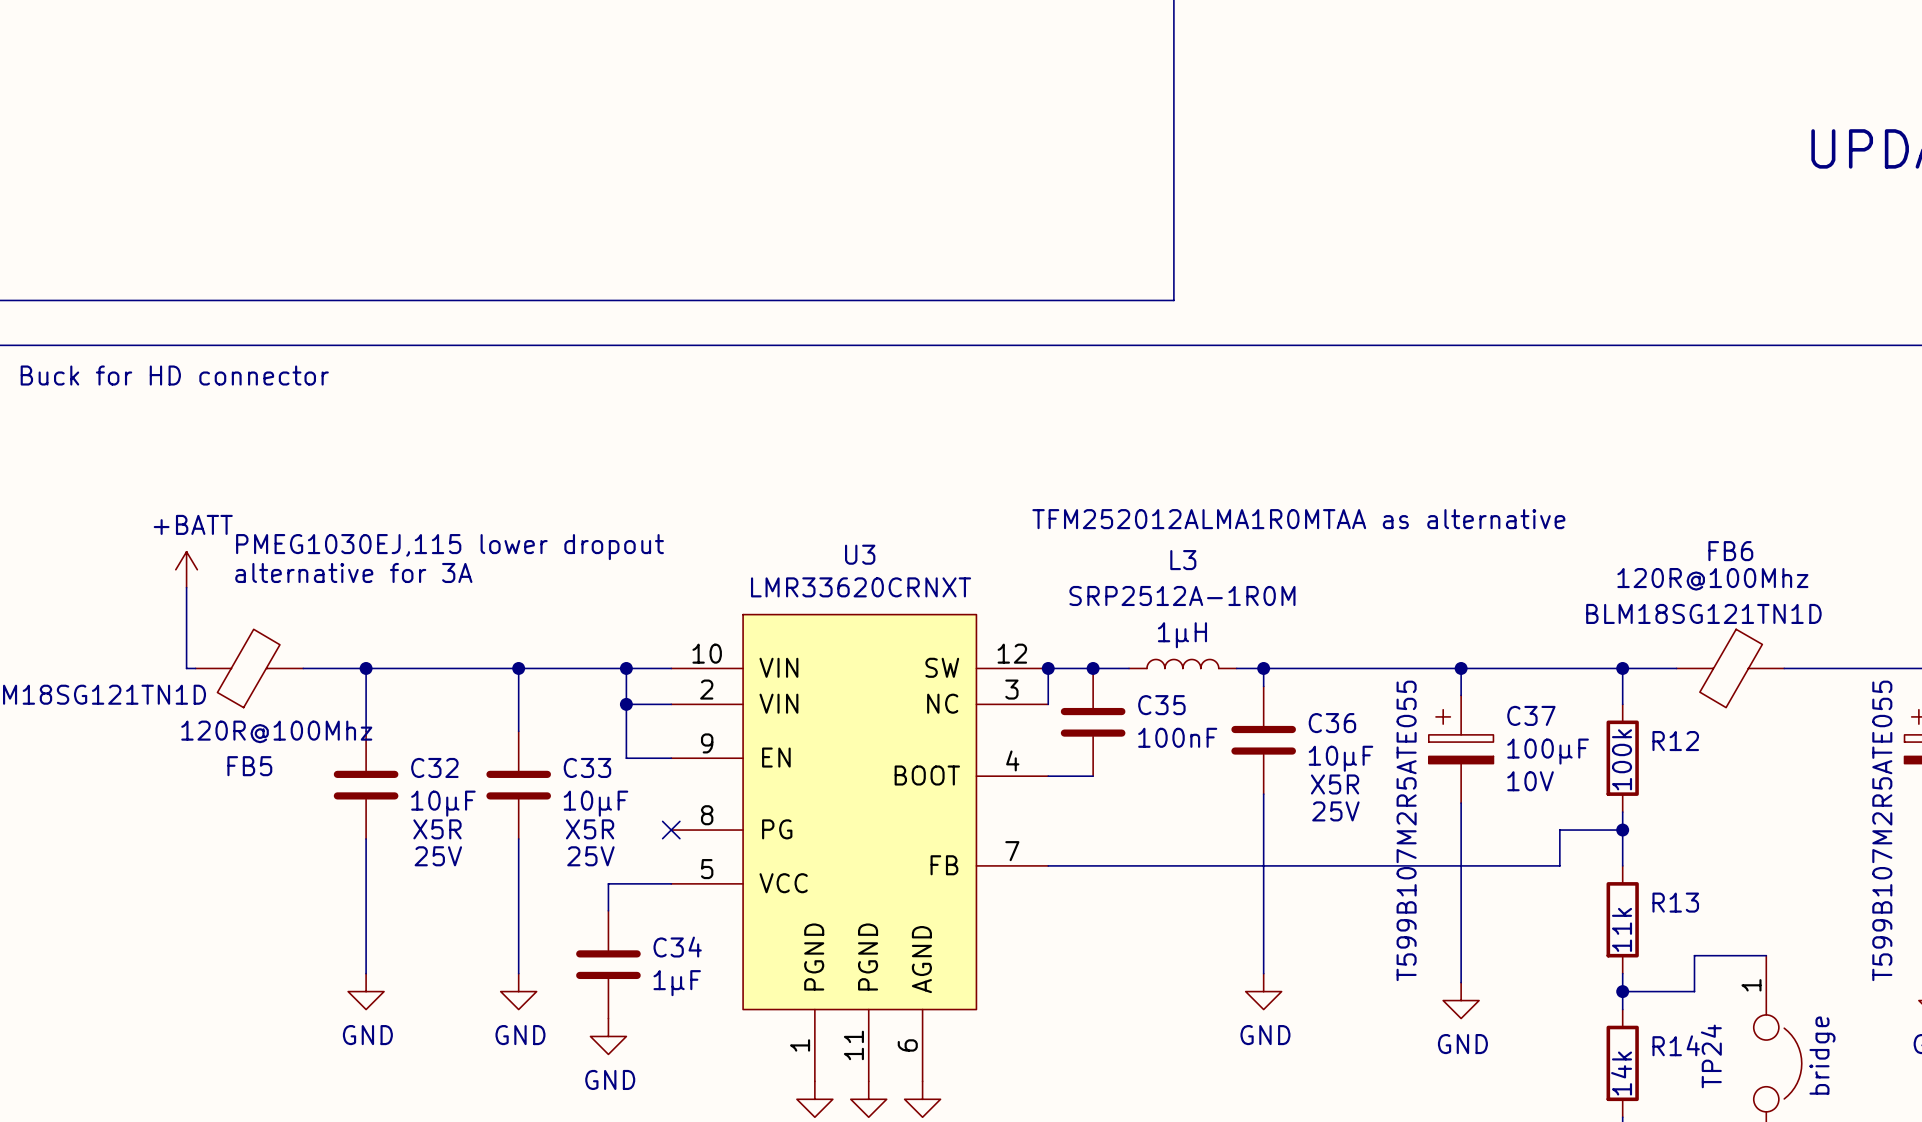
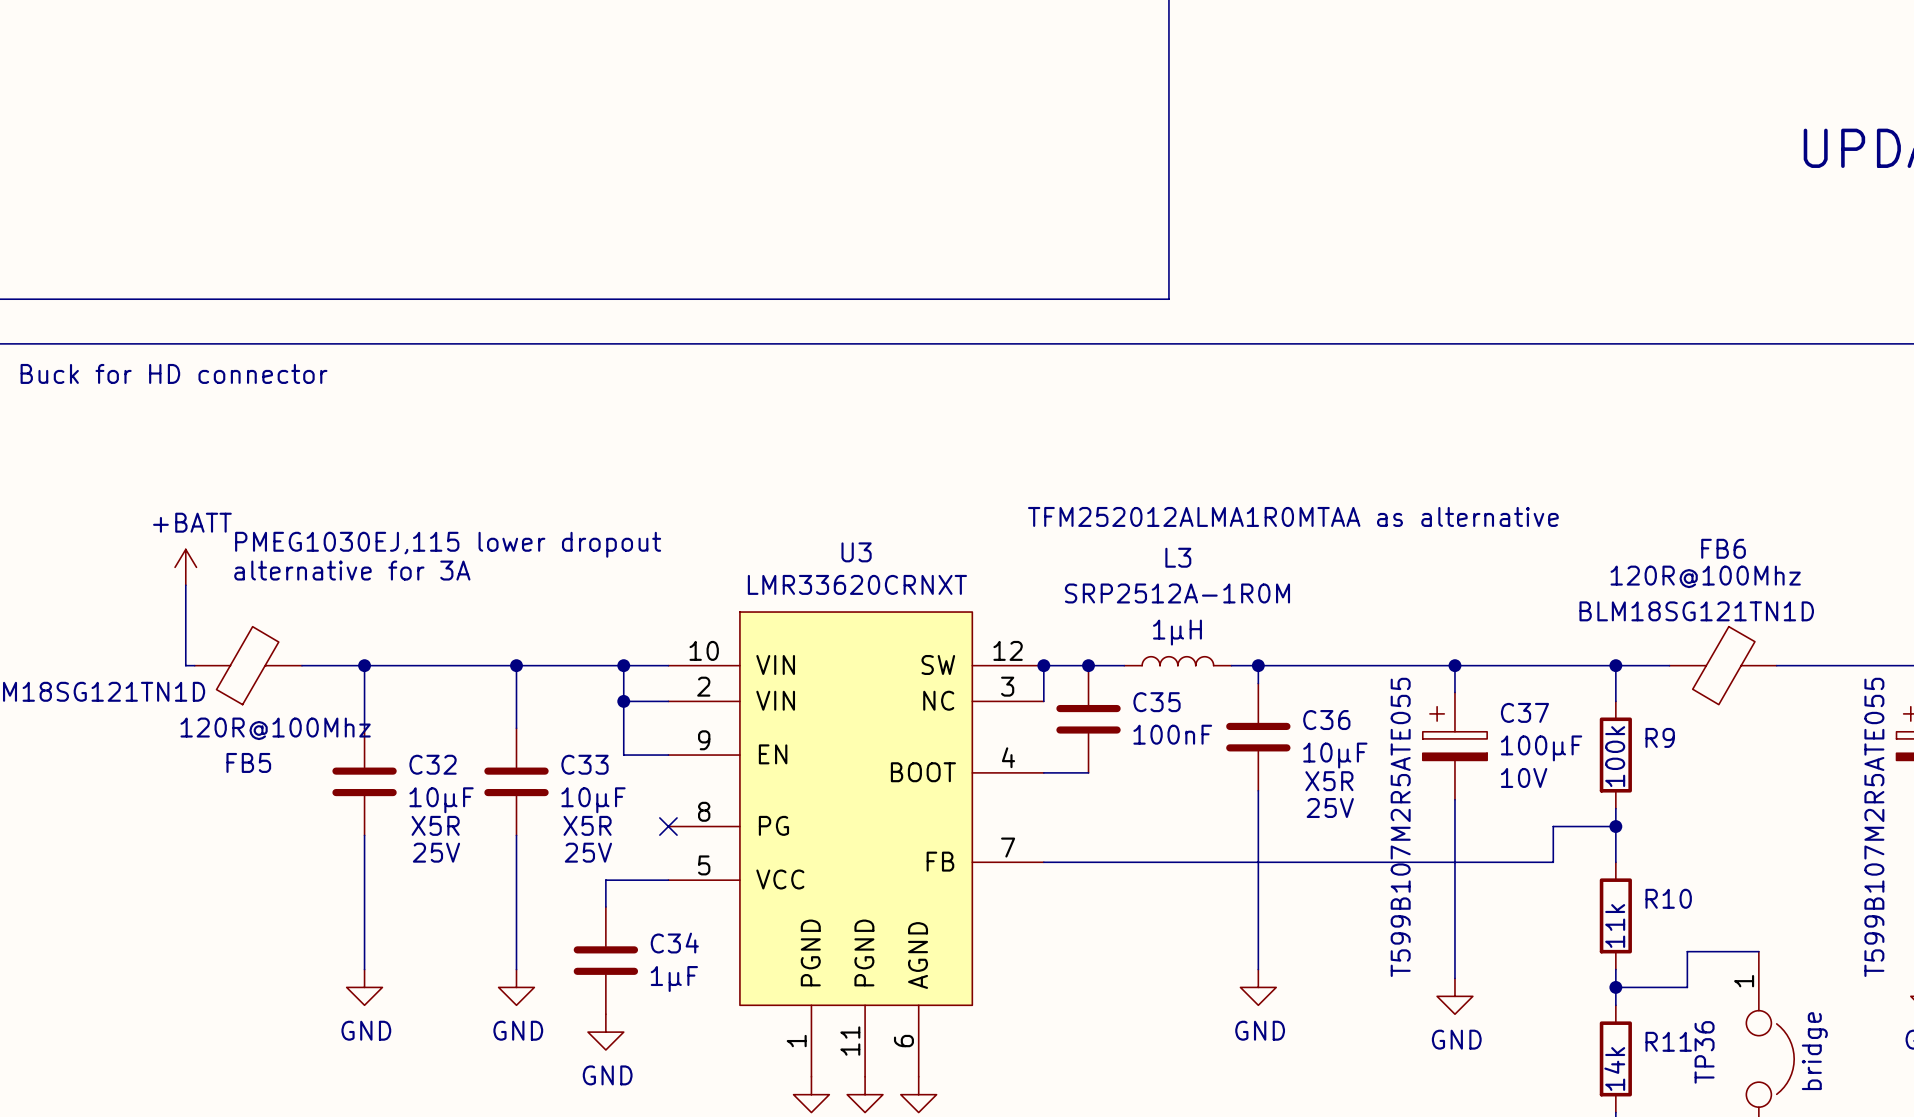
R12 name: R12 (1675, 741) -> R9 (1660, 737)
R13 name: R13 (1675, 902) -> R10 (1668, 898)
R14 name: R14 (1676, 1045) -> R11 (1668, 1041)
TP24 name: TP24 (1711, 1056) -> TP36 (1704, 1052)

